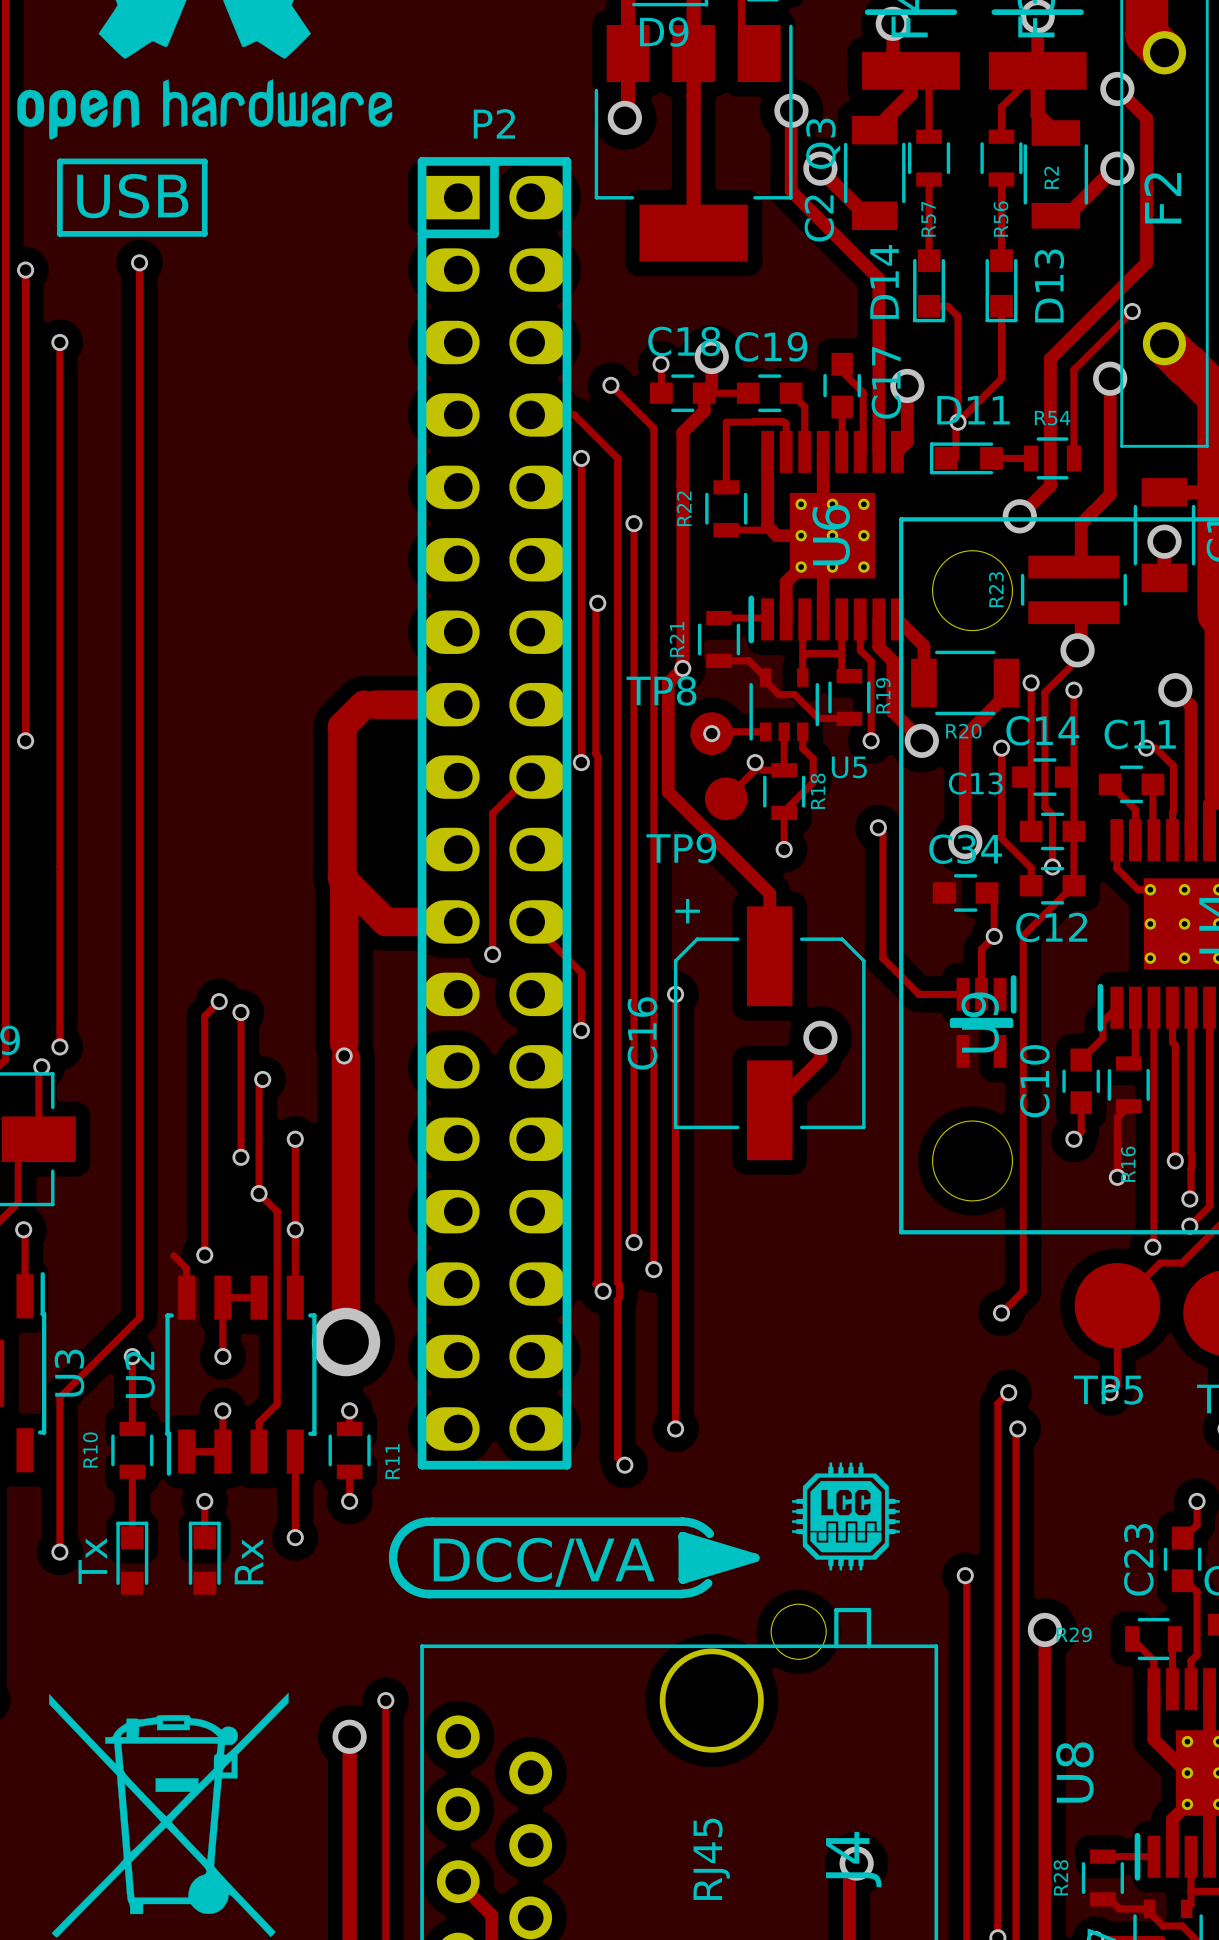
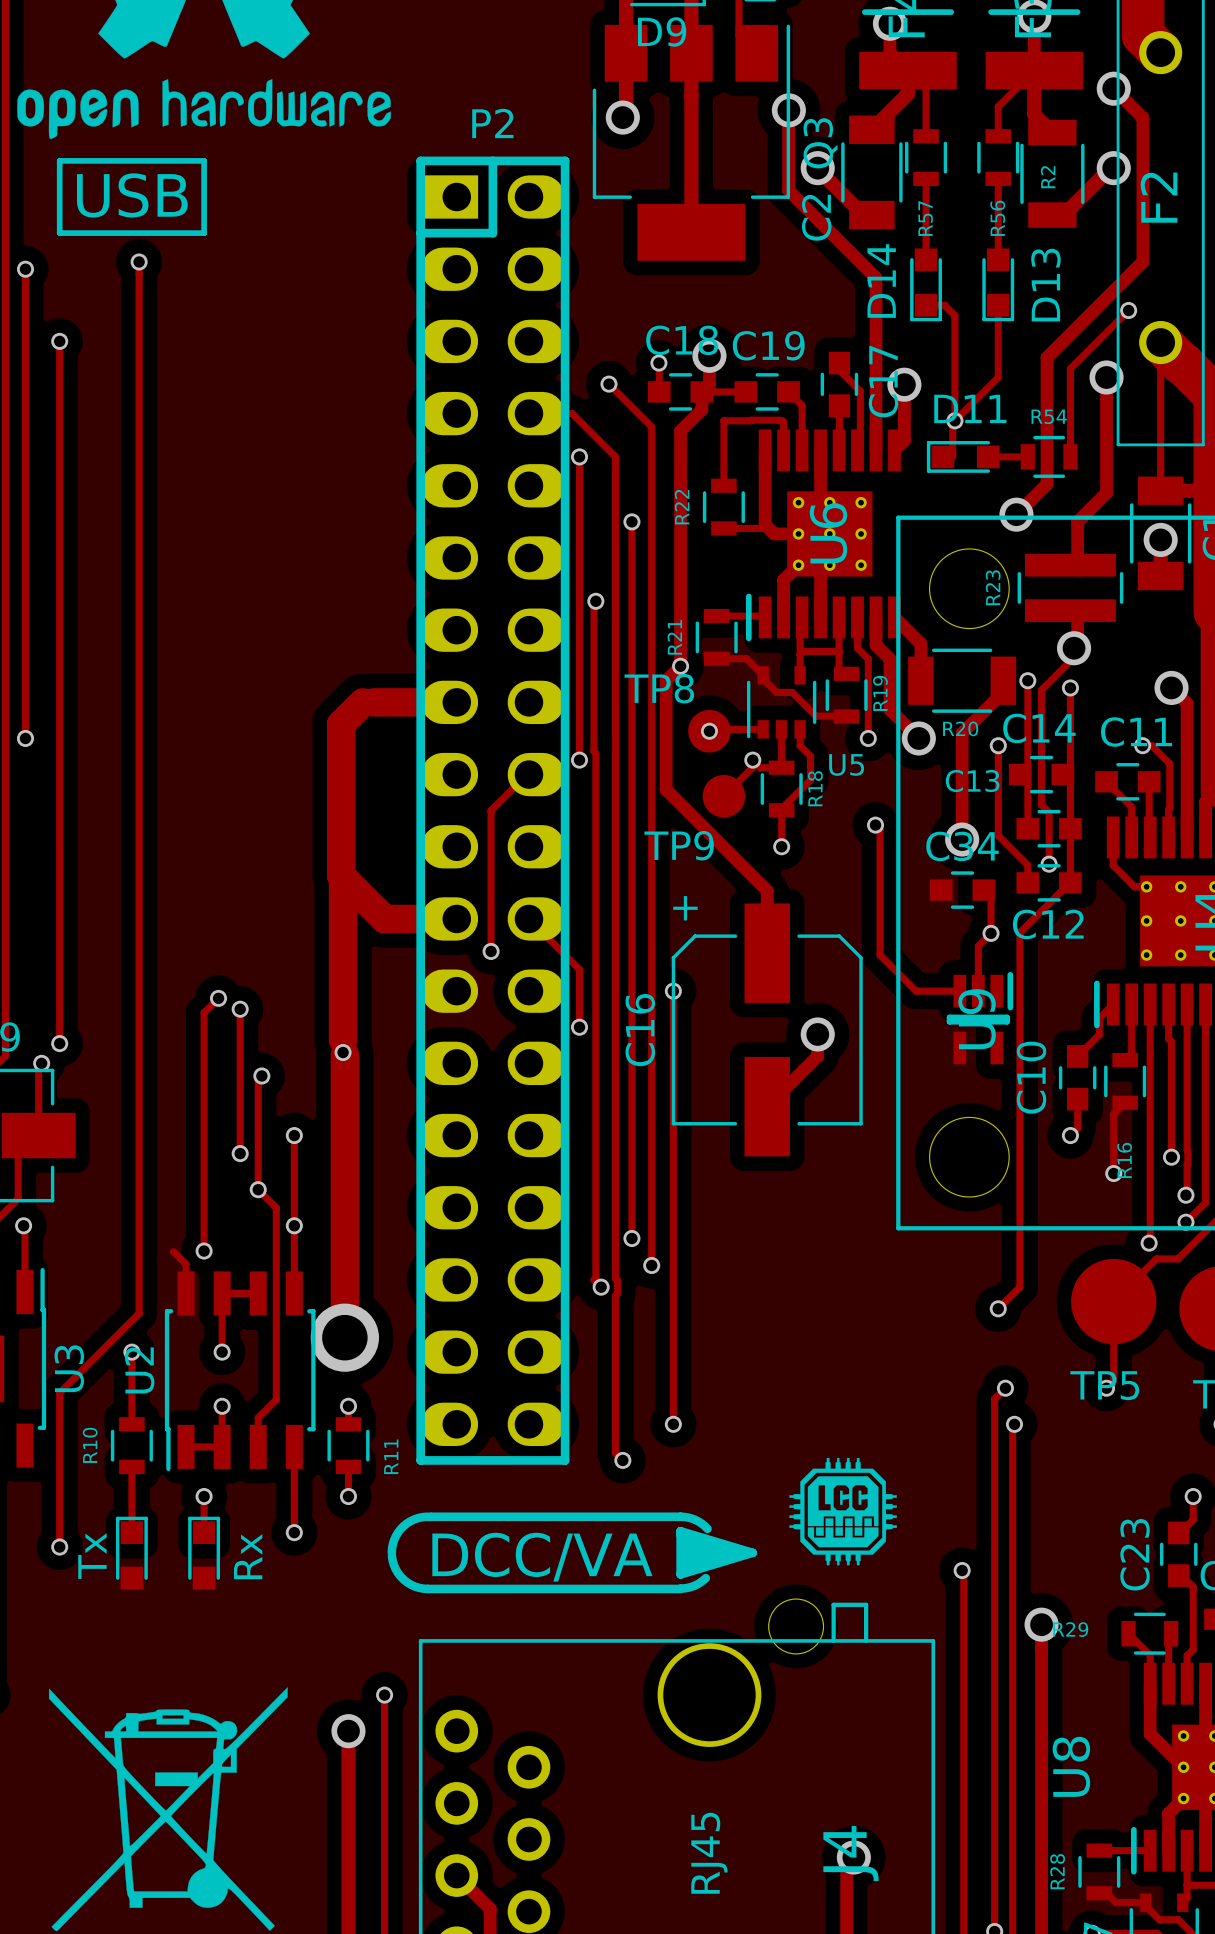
track: none -> (1160, 342) (1160, 490)

